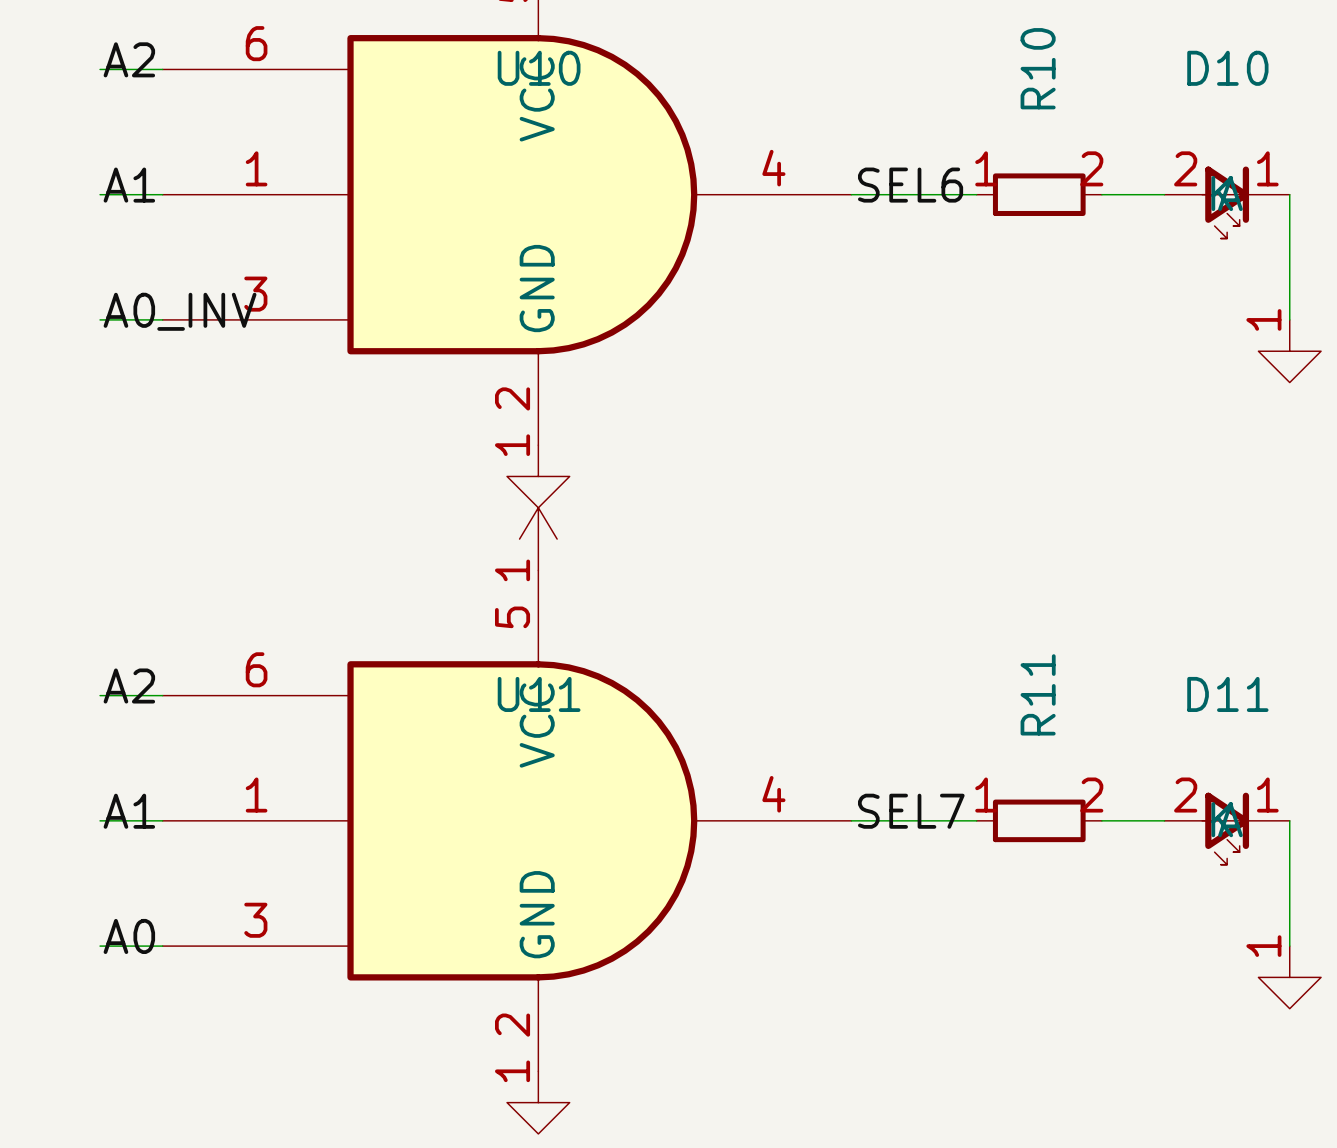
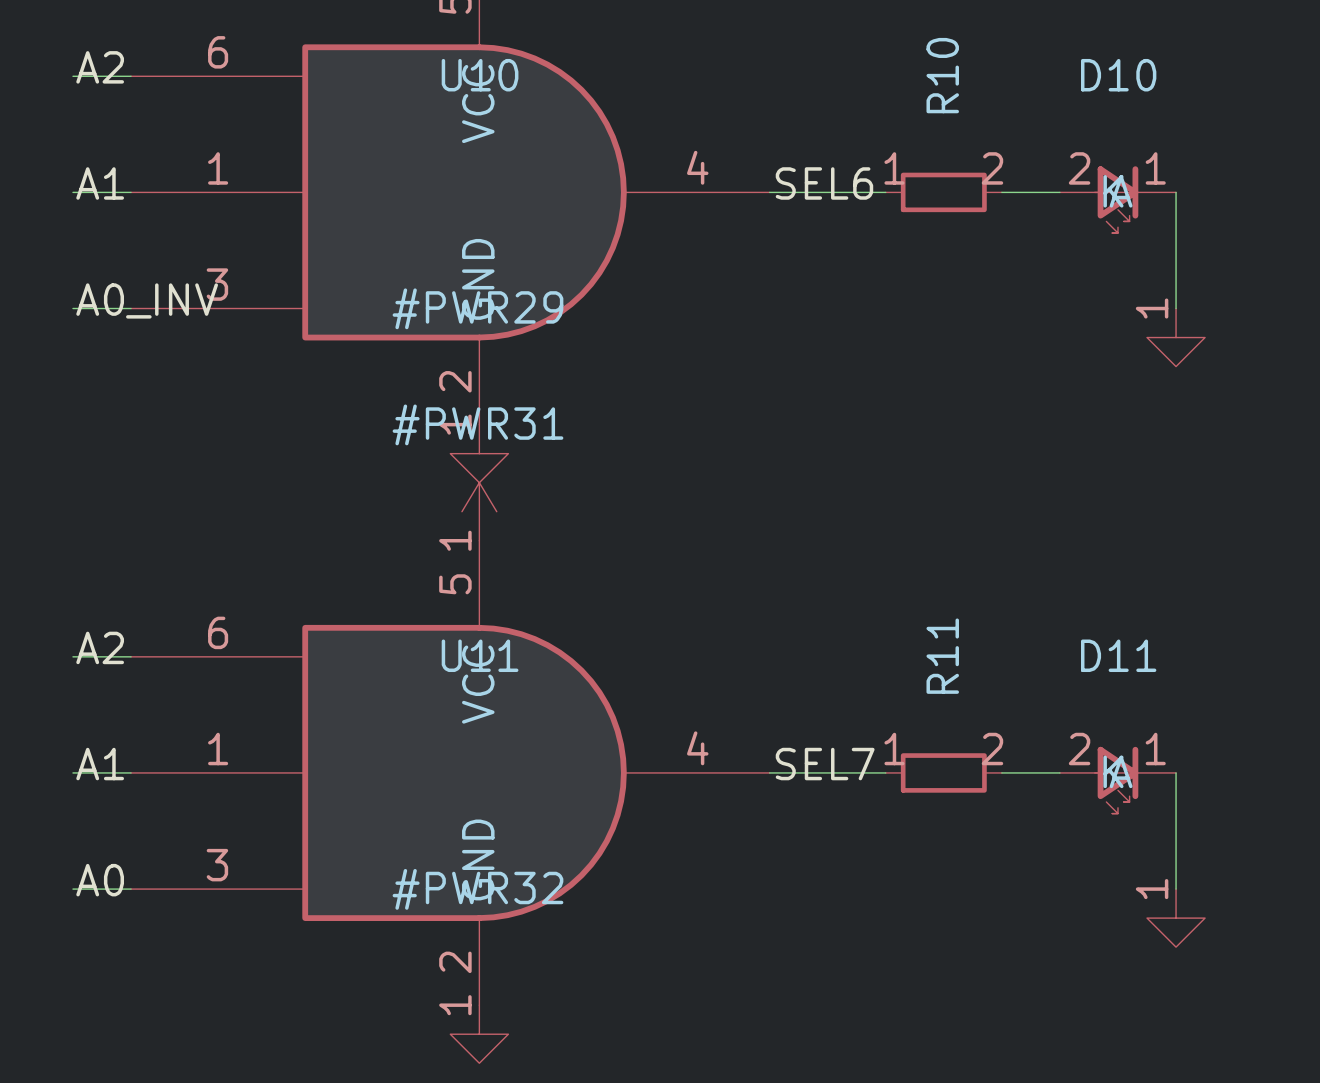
#PWR29 name: none -> #PWR29 (477, 308)
#PWR31 name: none -> #PWR31 (477, 424)
#PWR32 name: none -> #PWR32 (477, 889)

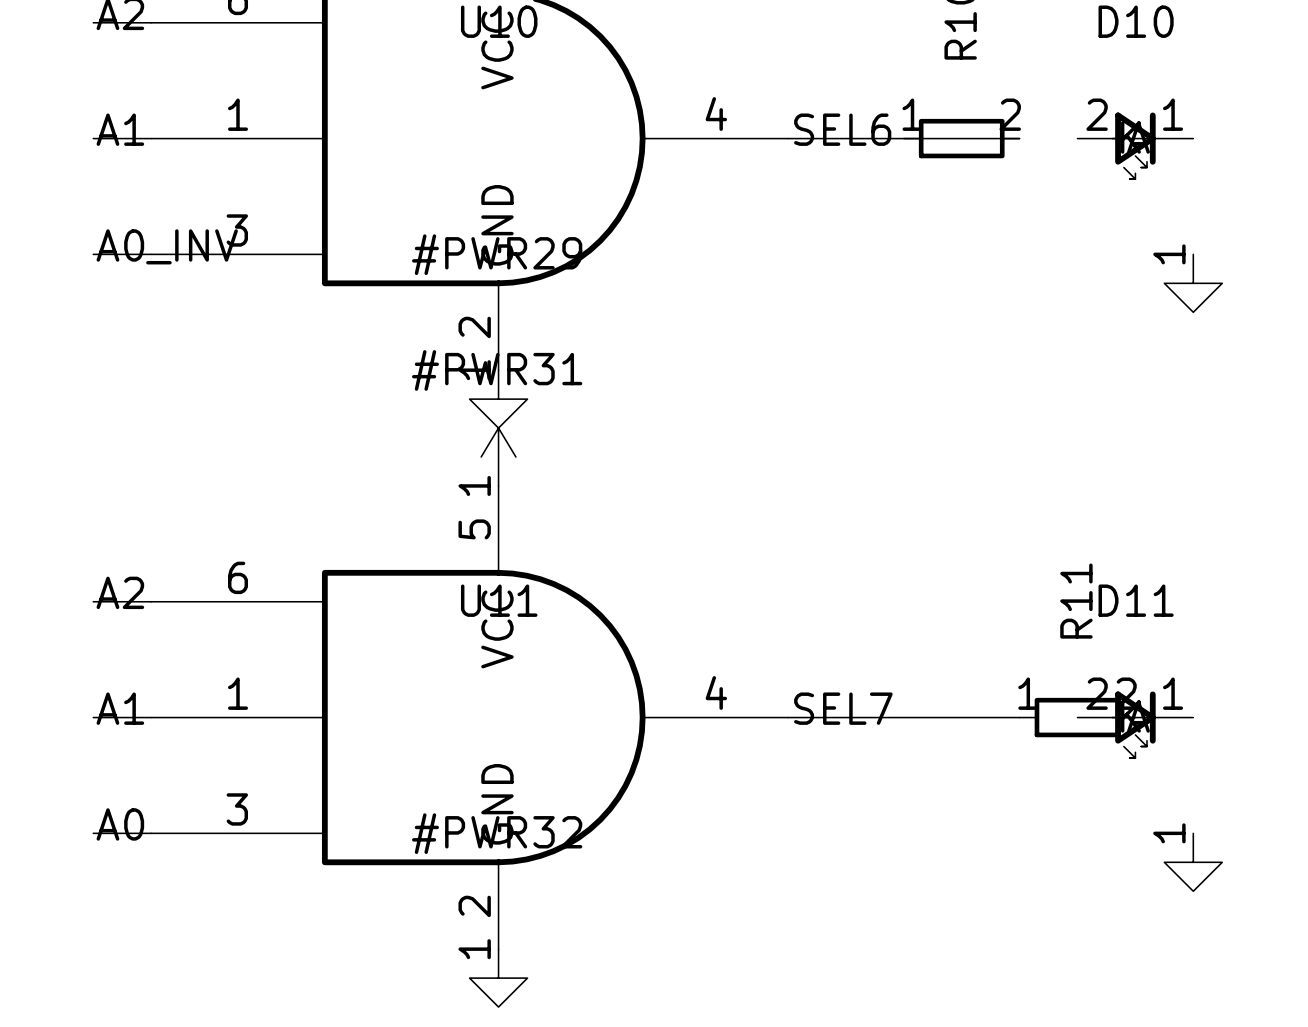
wire: (1001, 192) (1059, 192) -> (1019, 138) (903, 138)
wire: (1176, 192) (1176, 308) -> none
R11 position: (943, 772) -> (1077, 717)
wire: (1001, 772) (1059, 772) -> (1019, 717) (903, 717)
wire: (1176, 772) (1176, 889) -> none

